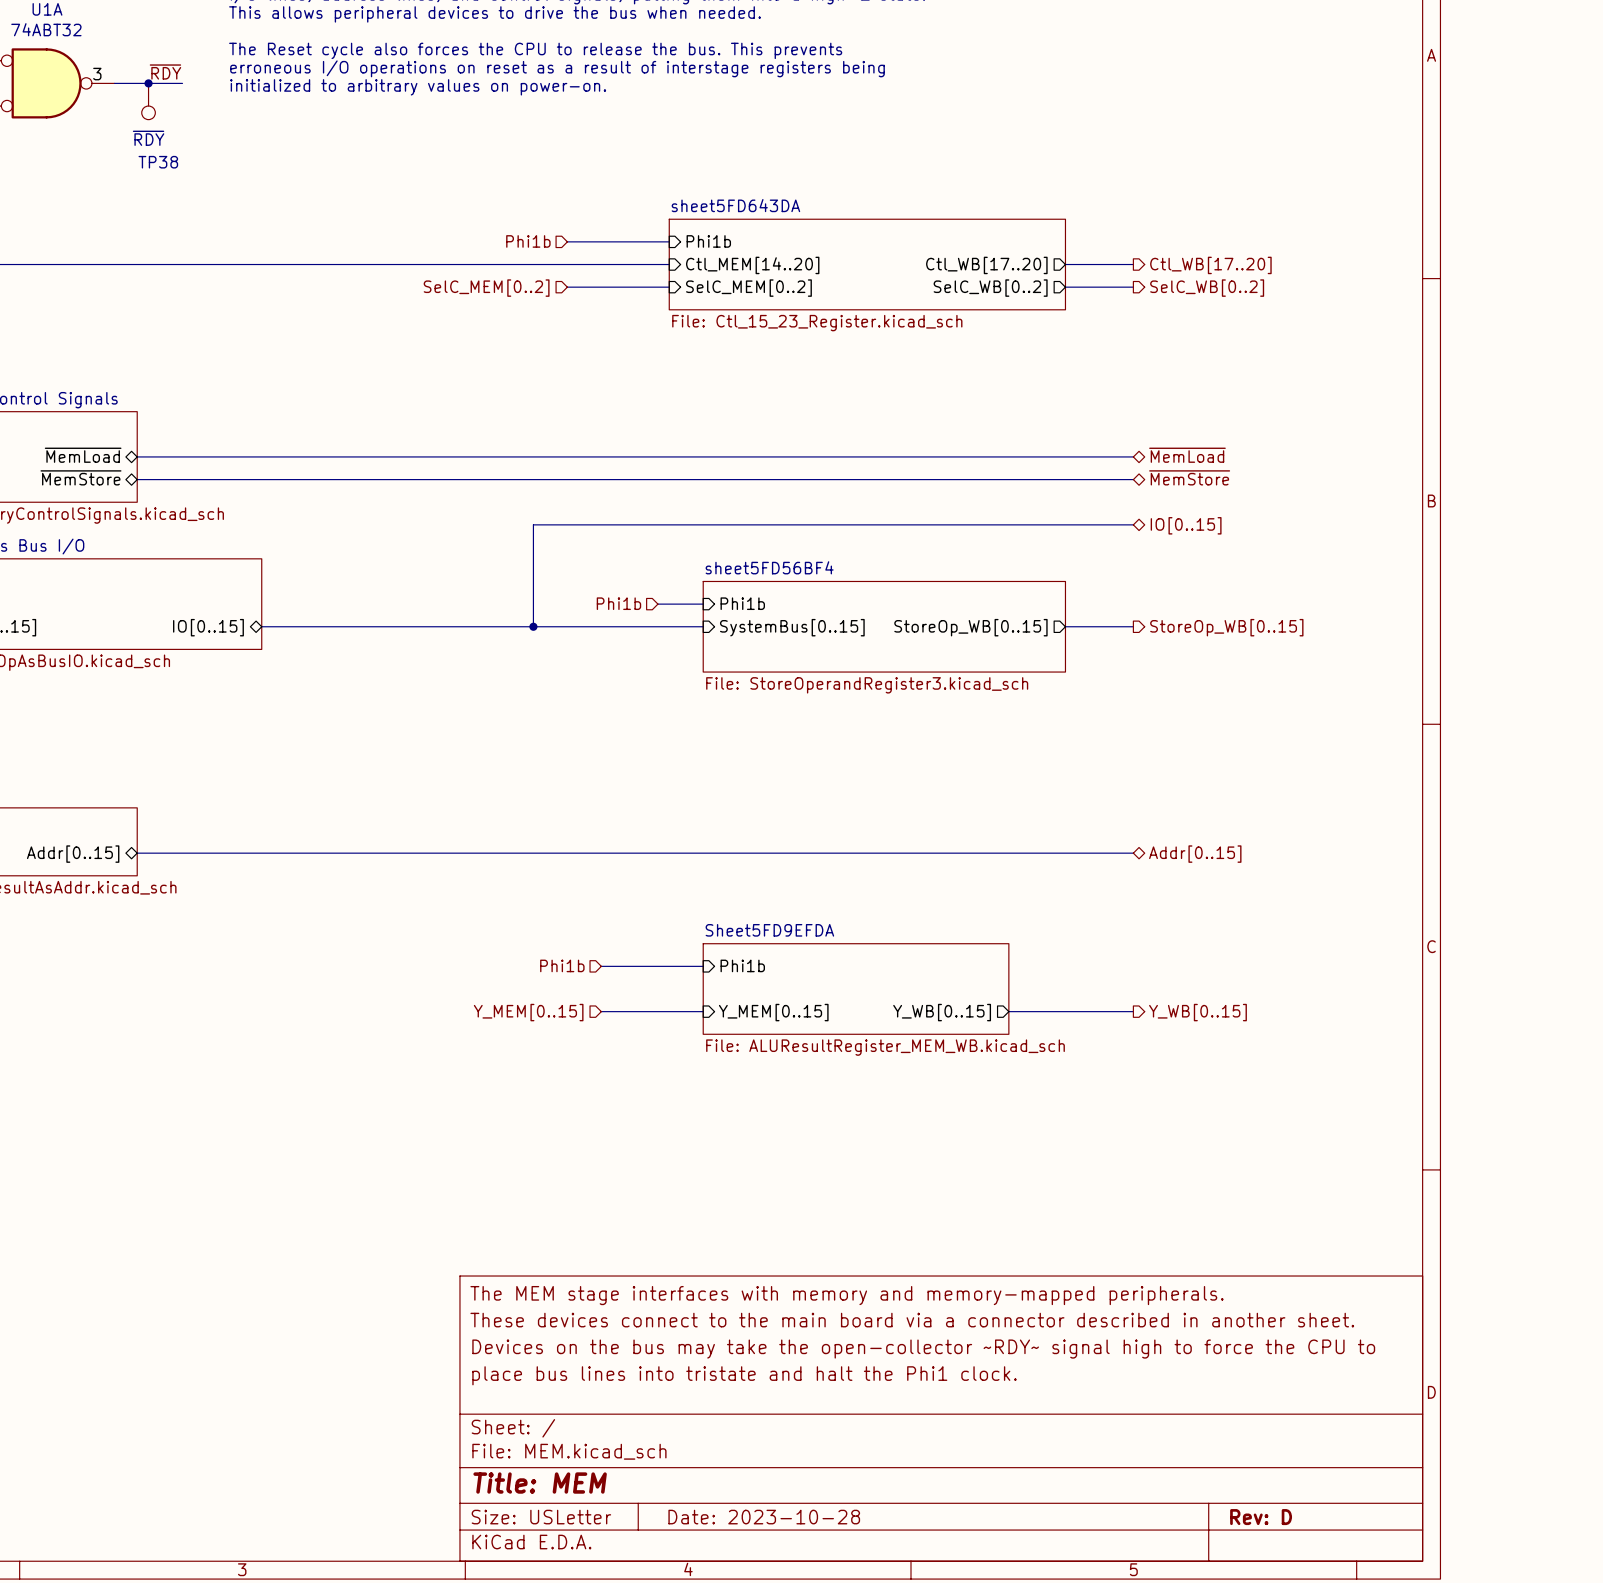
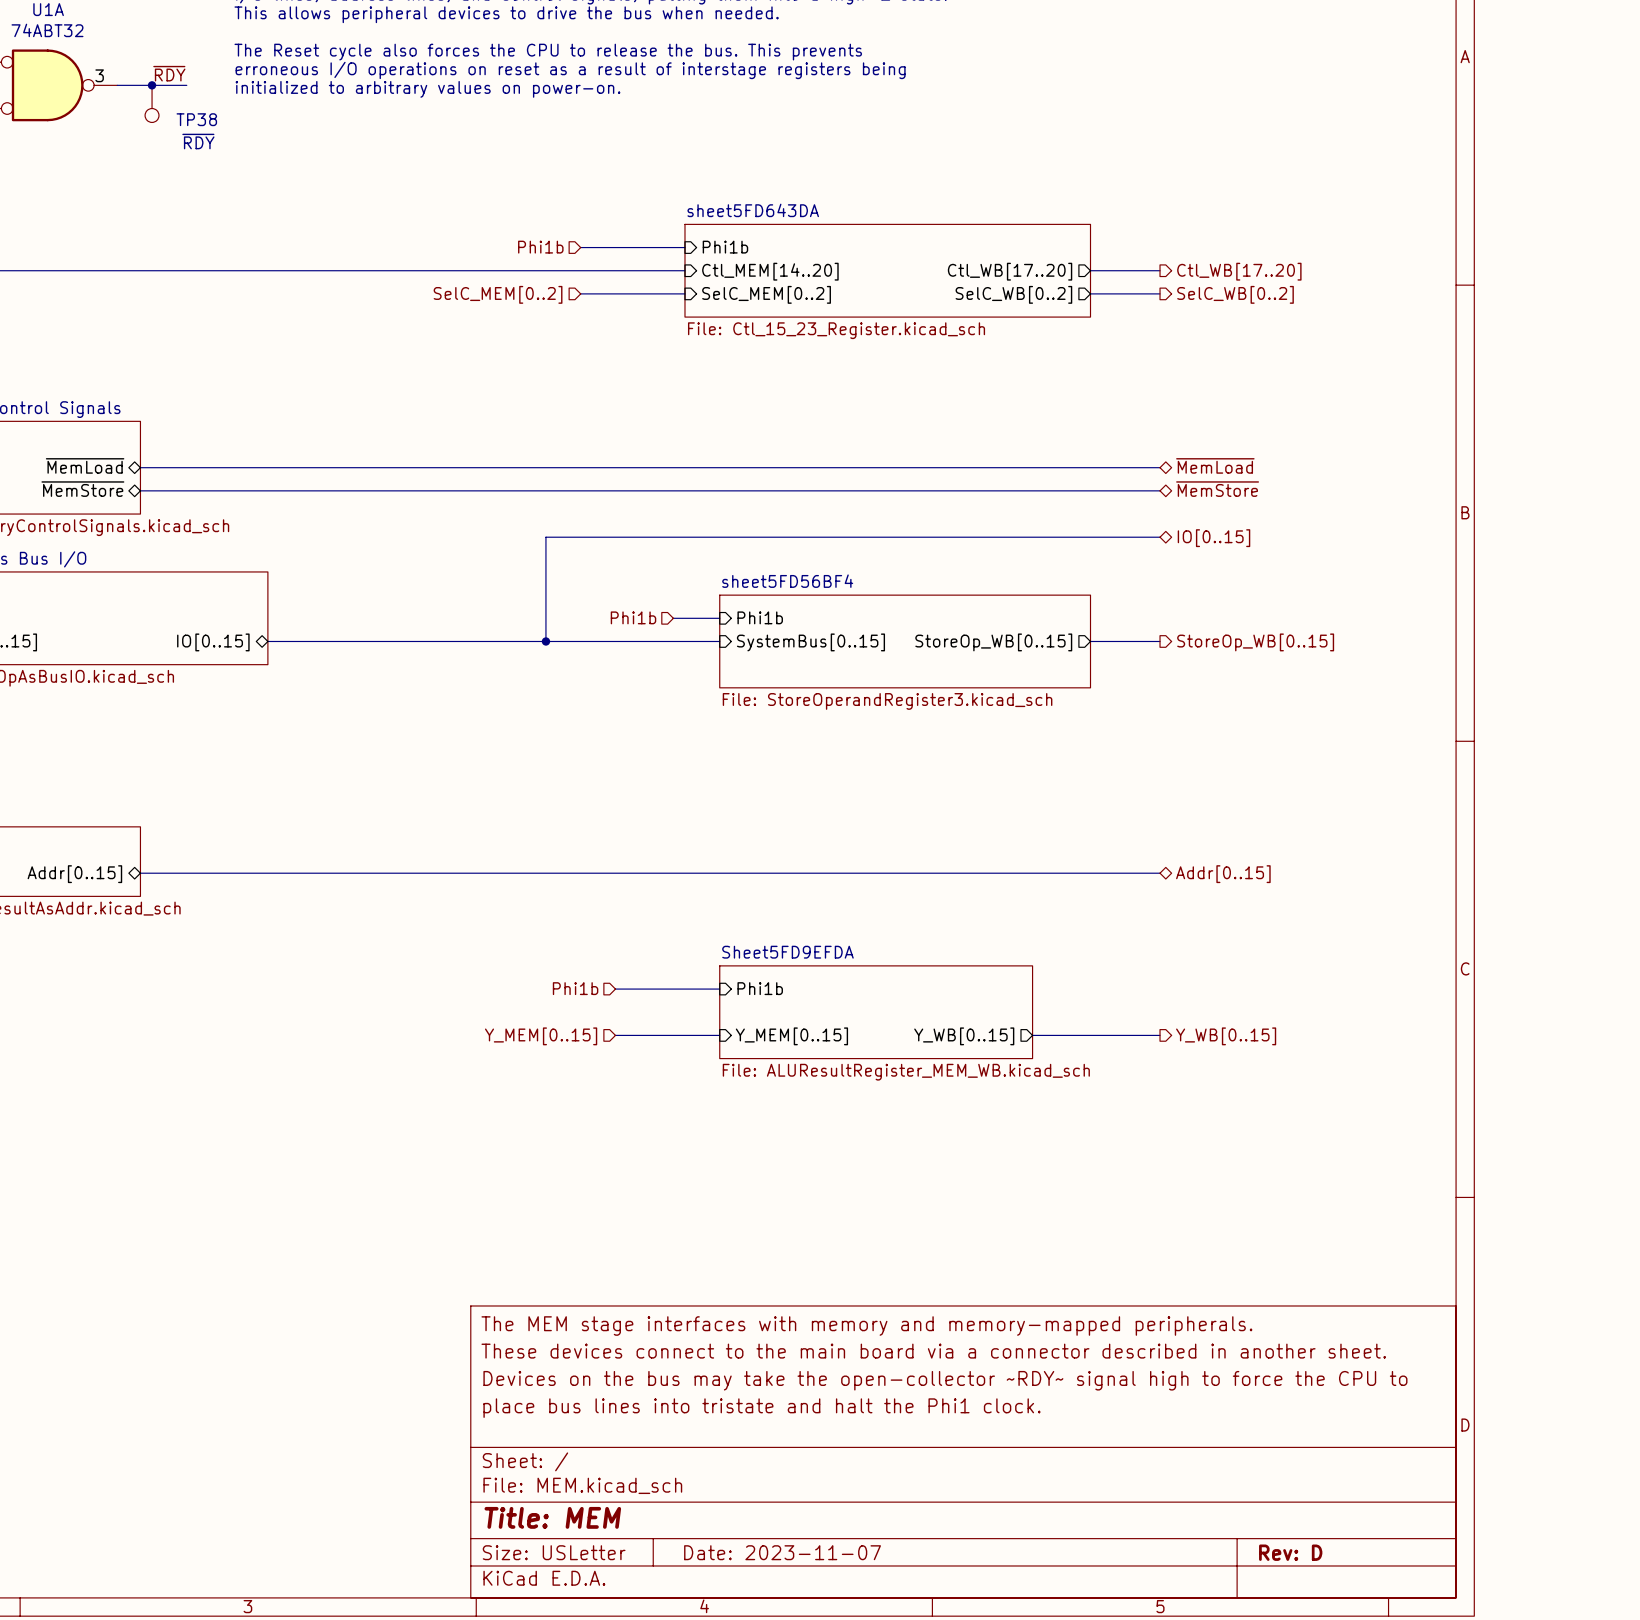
TP38 value position: ~{RDY} (148, 138) -> ~{RDY} (198, 141)
TP38 name position: TP38 (158, 162) -> TP38 (196, 119)
title block: Date: 2023-10-28 (764, 1517) -> Date: 2023-11-07 (782, 1552)

